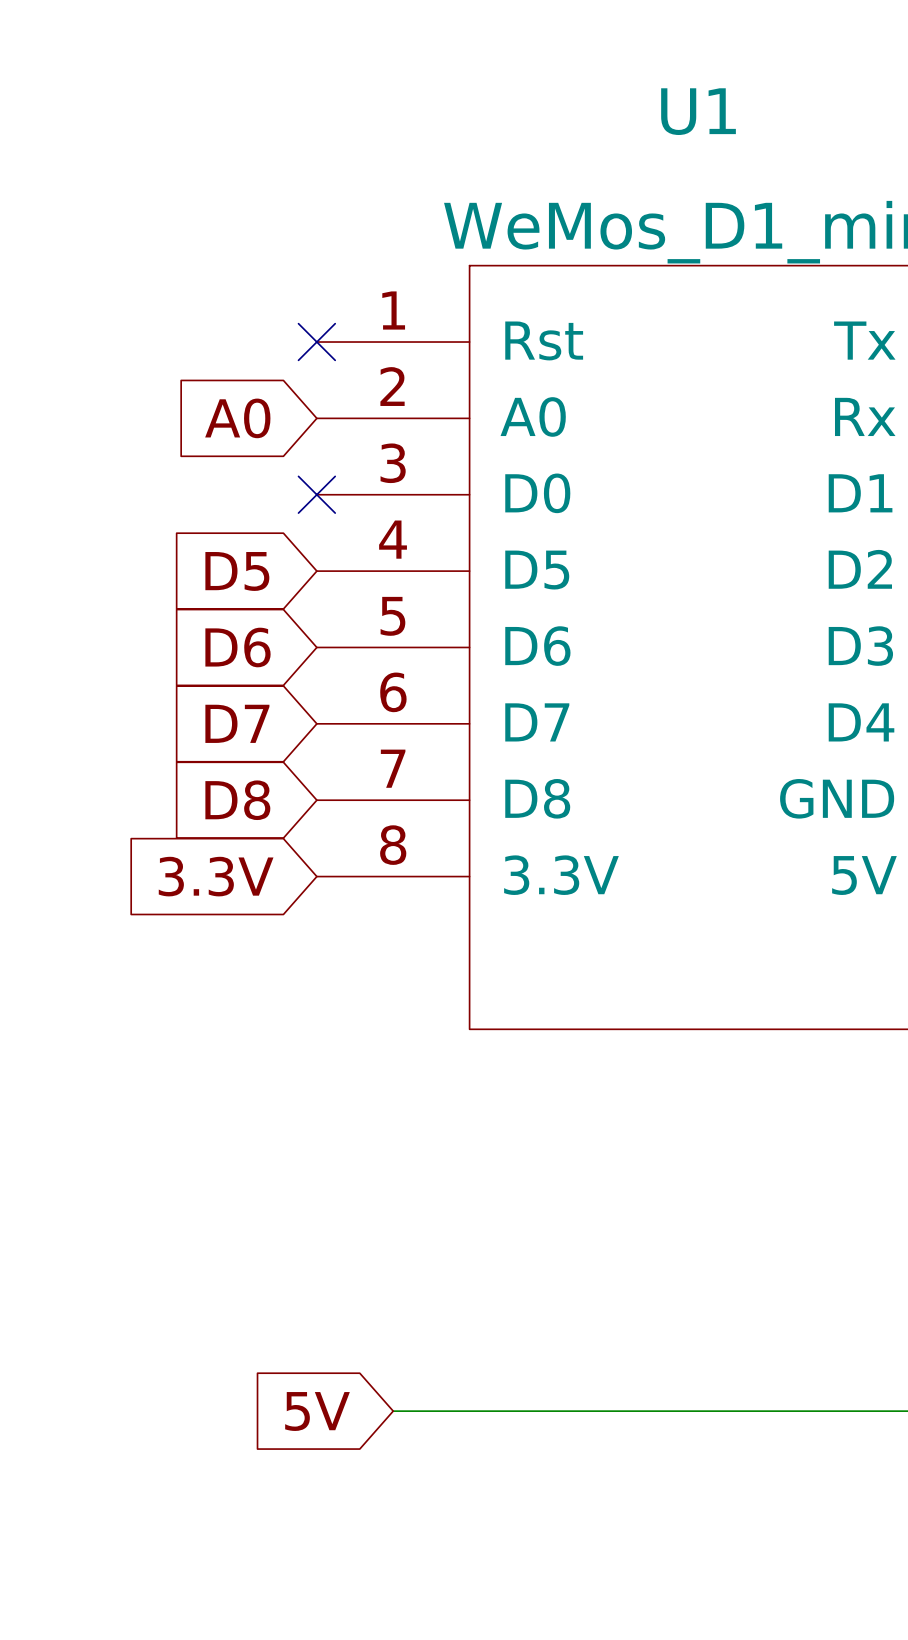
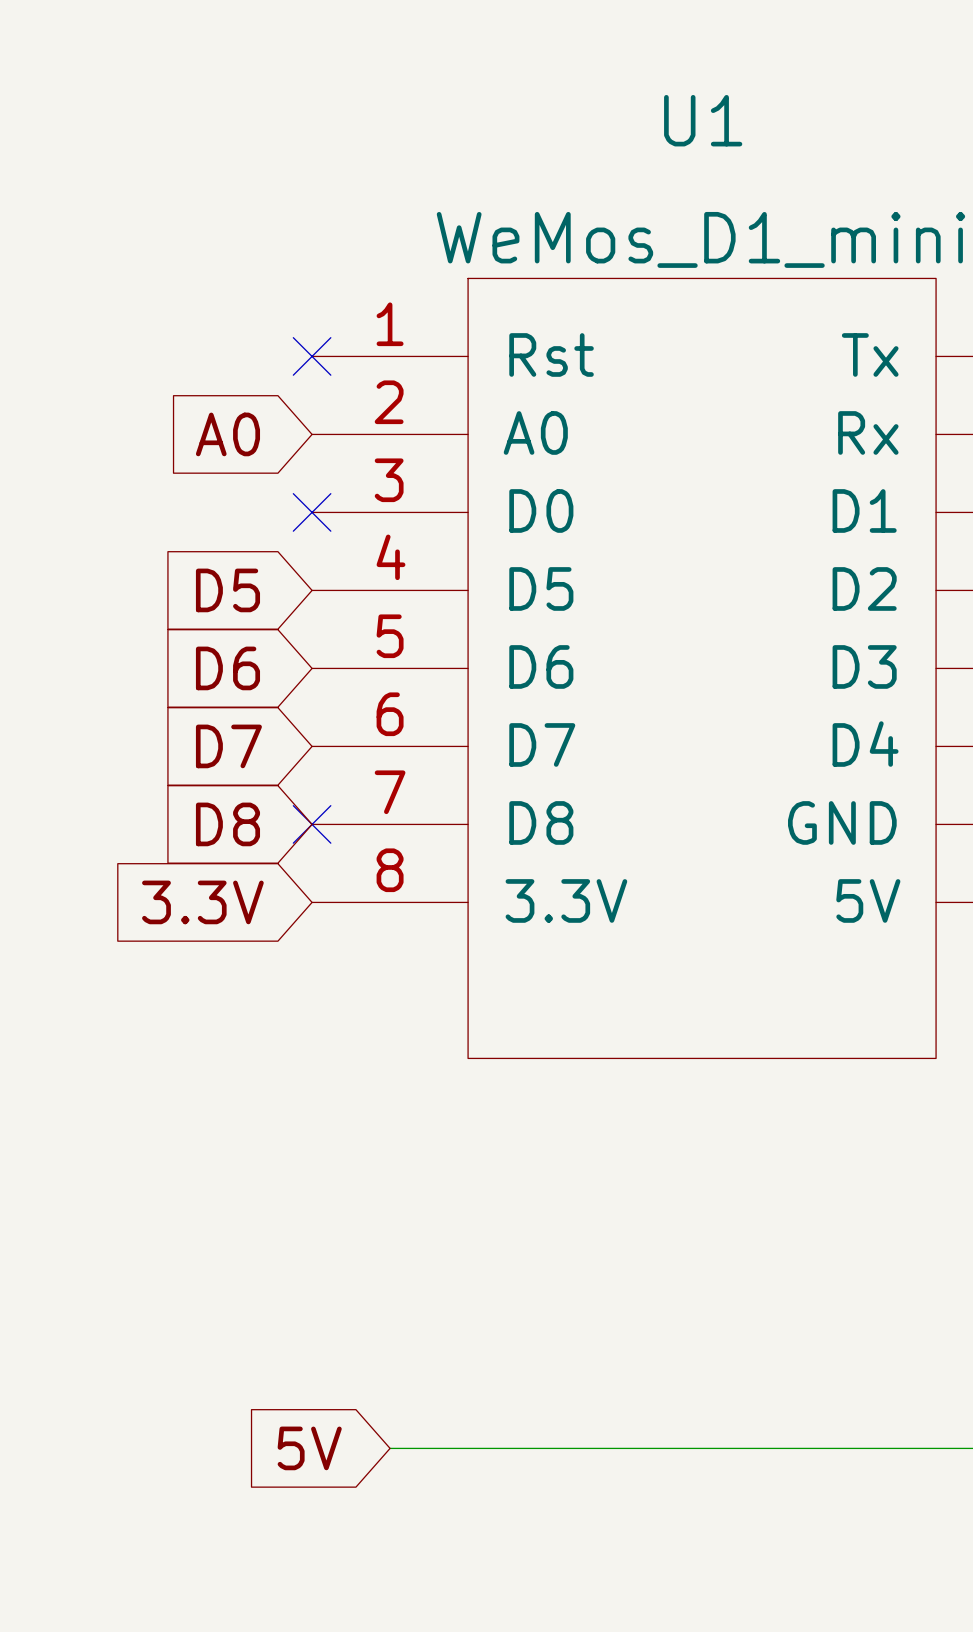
no-connect mark: none -> (312, 824)

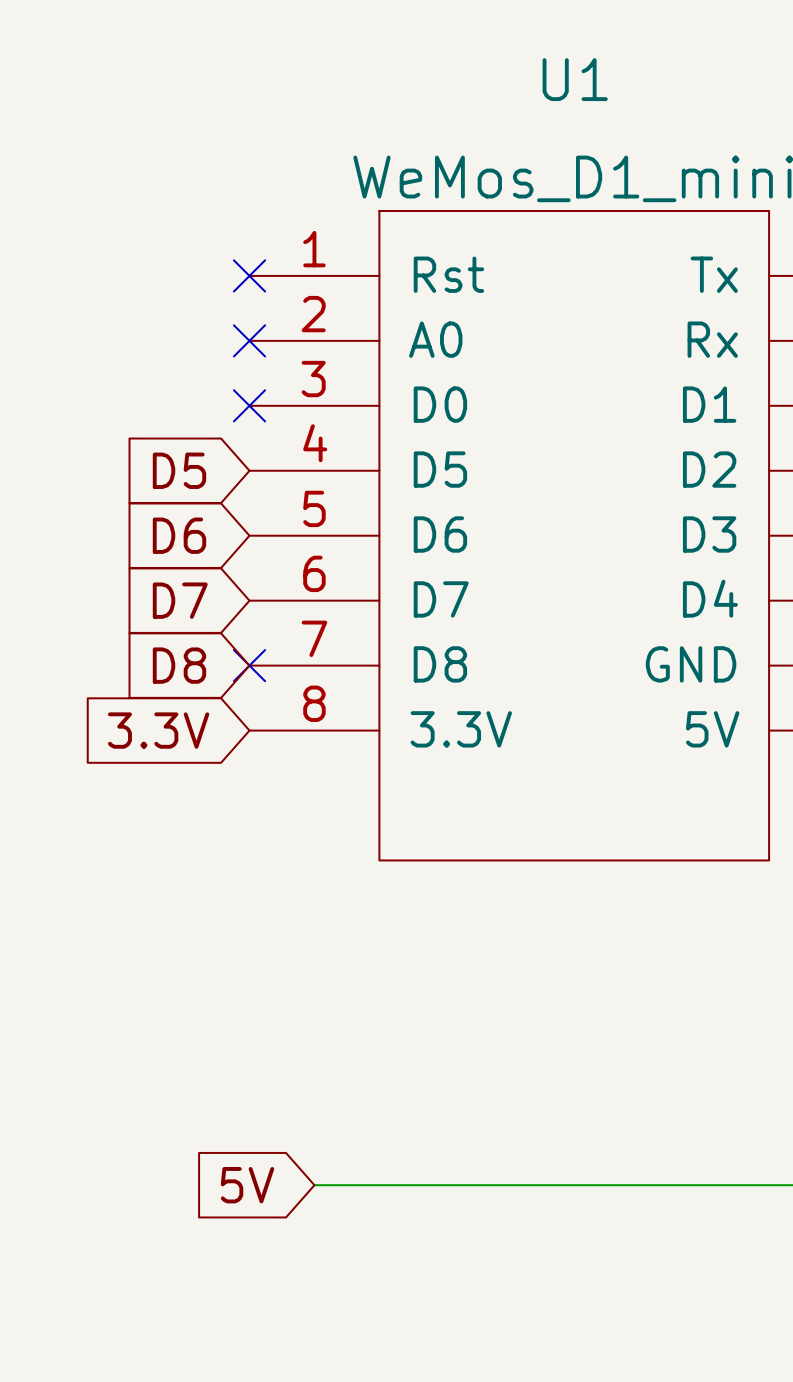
global label: A0 (227, 434) -> none
no-connect mark: none -> (249, 340)

